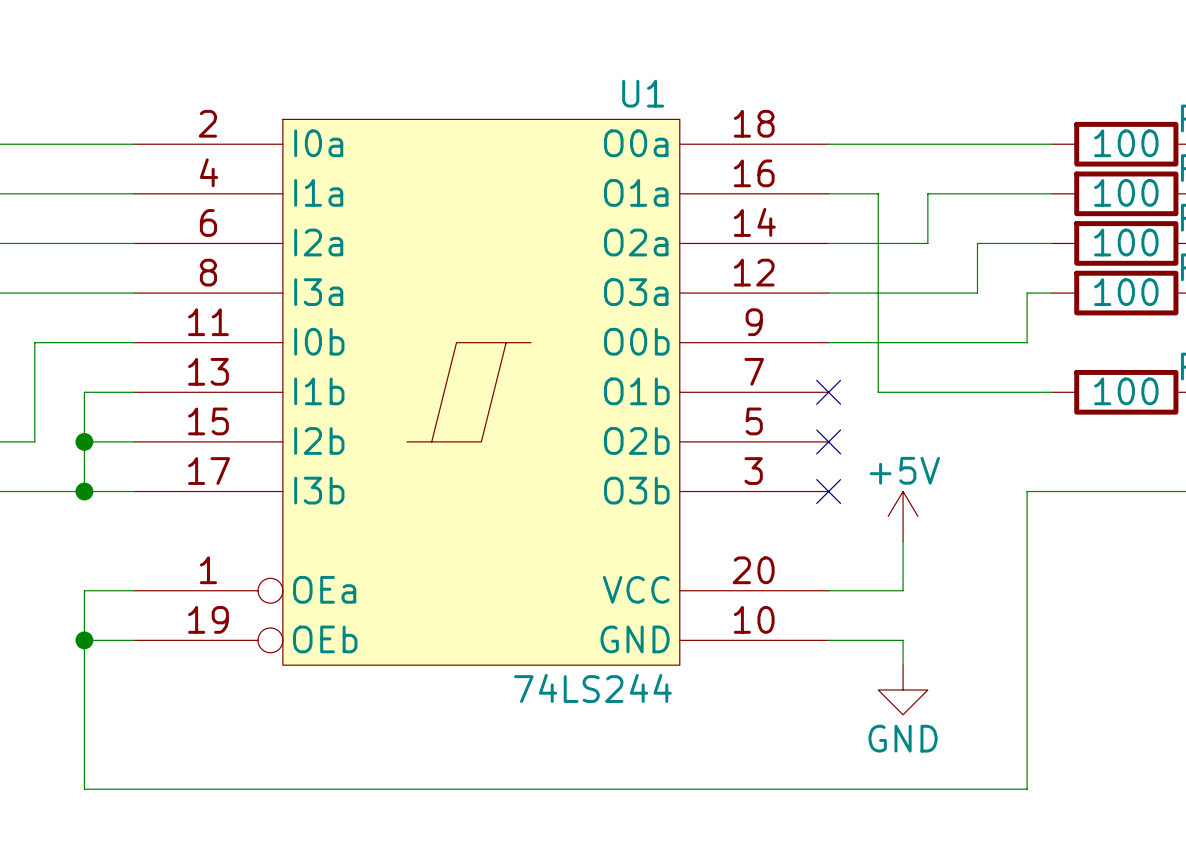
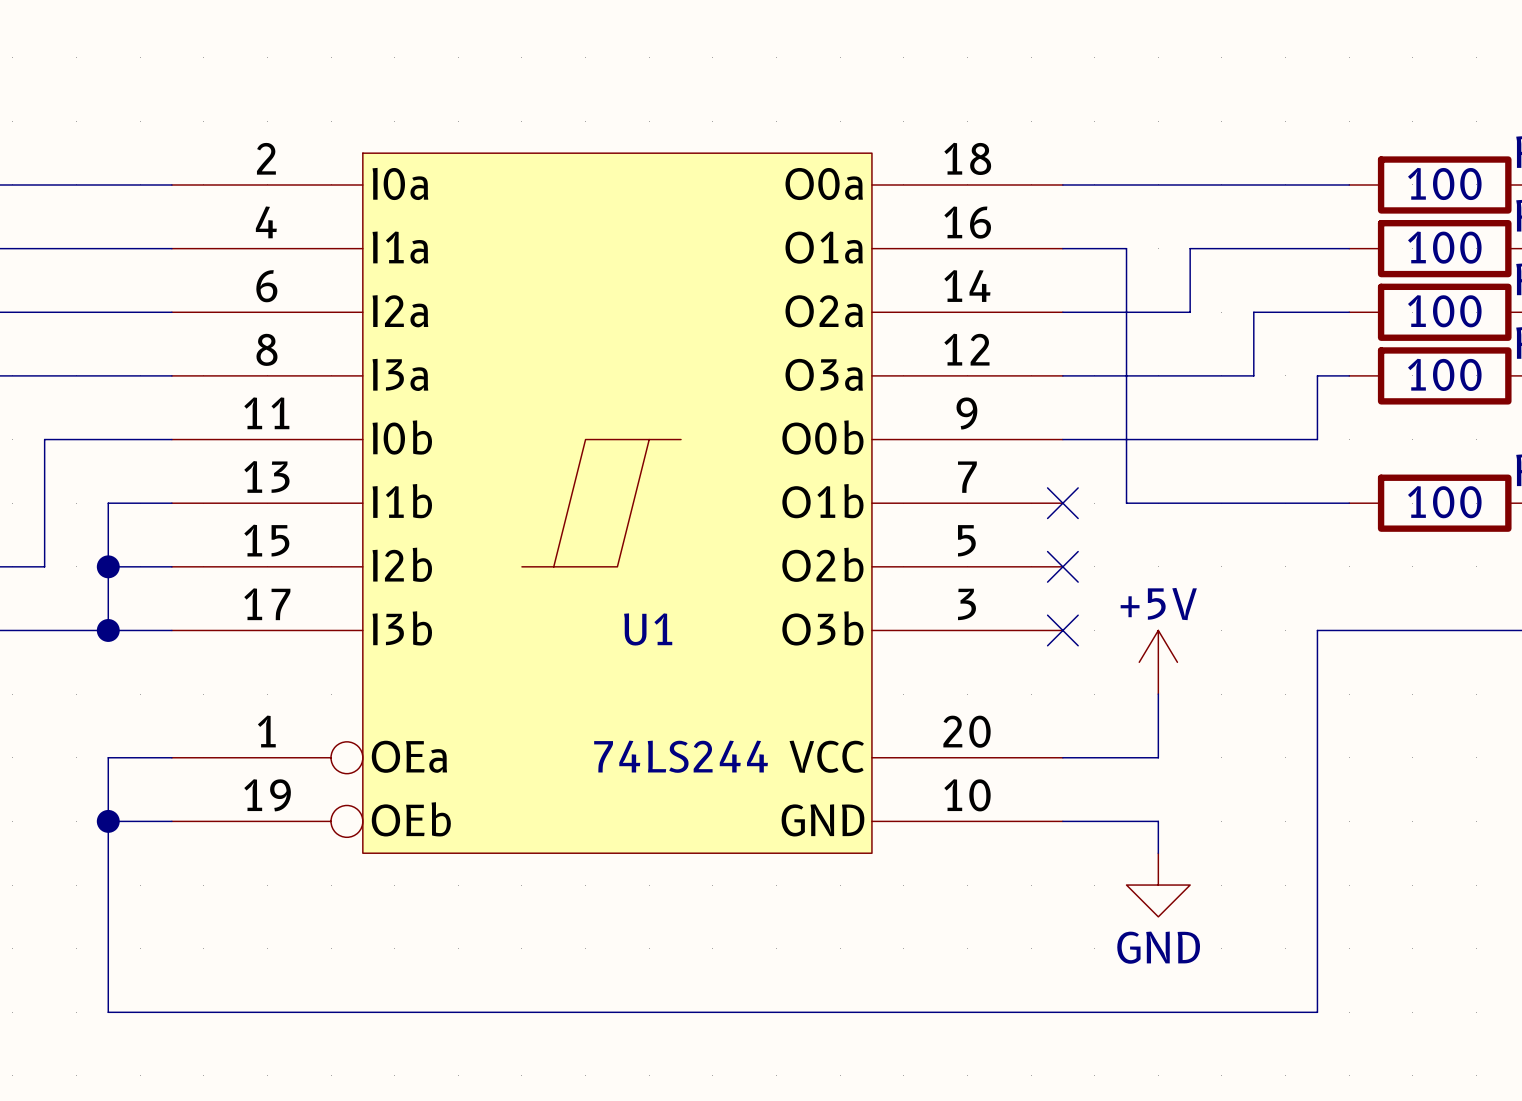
U1 name position: U1 (643, 93) -> U1 (648, 629)
U1 value position: 74LS244 (592, 688) -> 74LS244 (681, 756)

